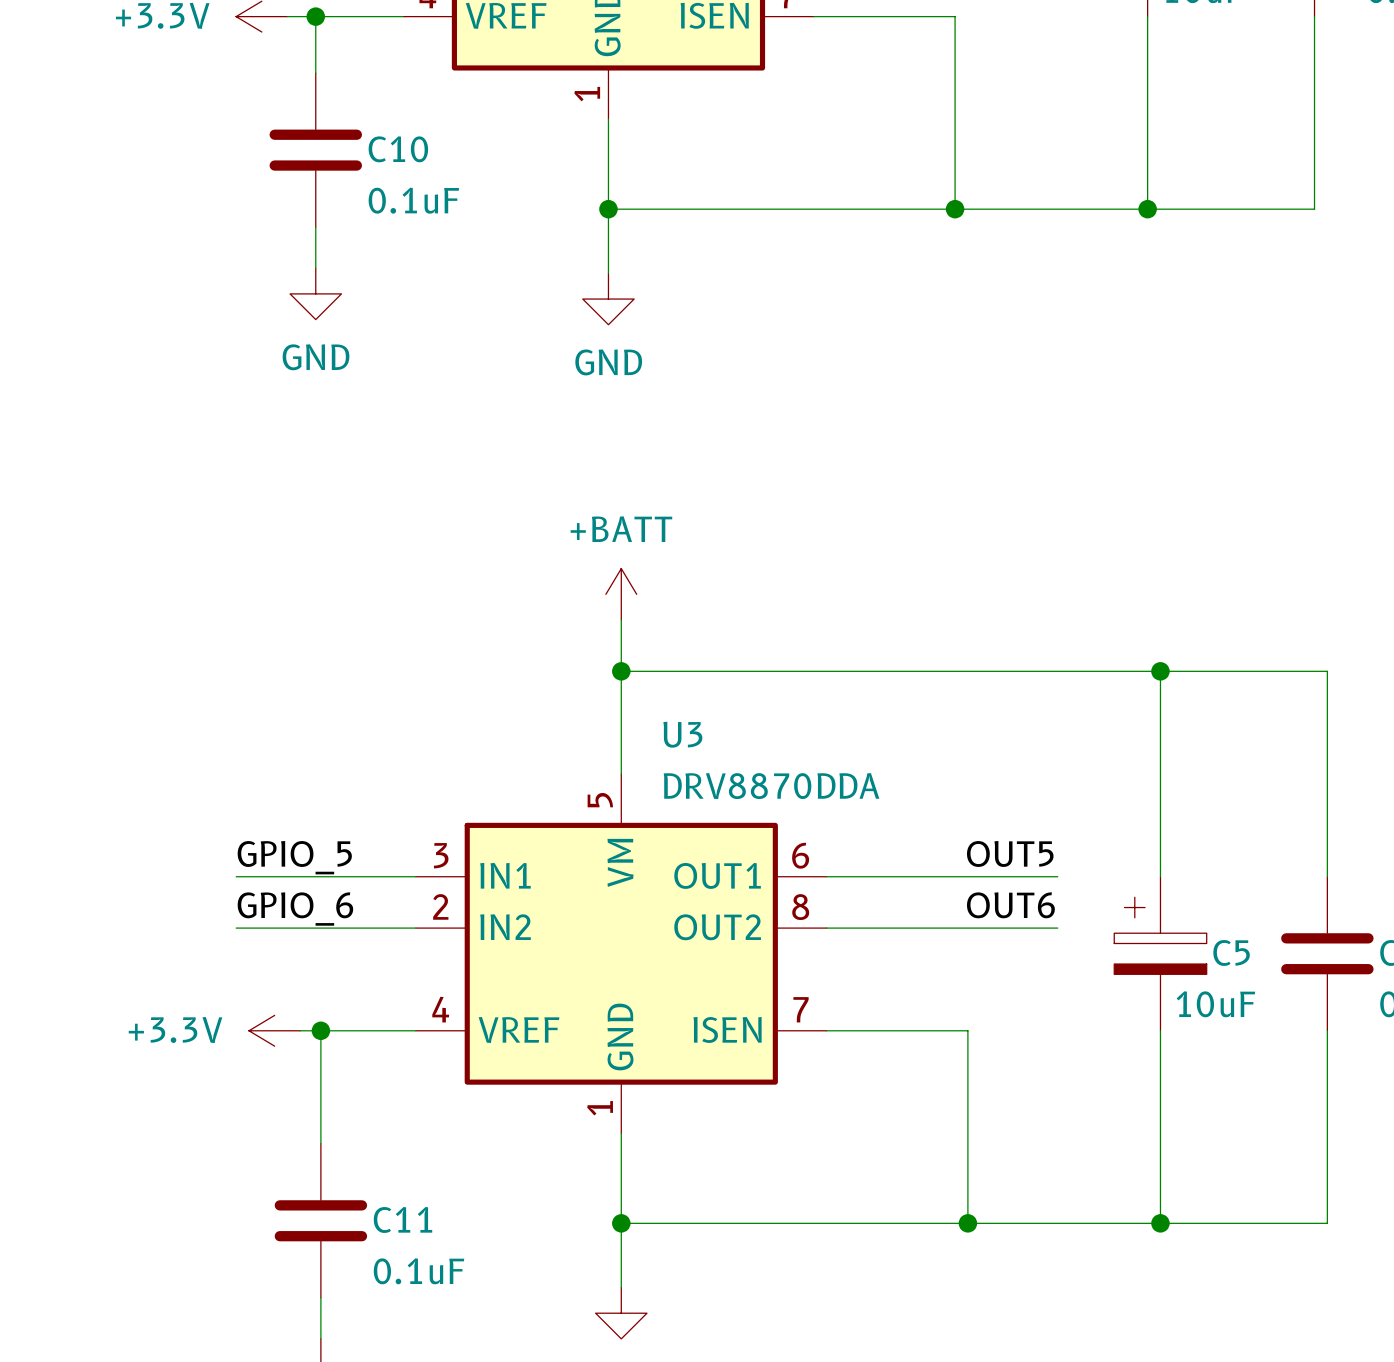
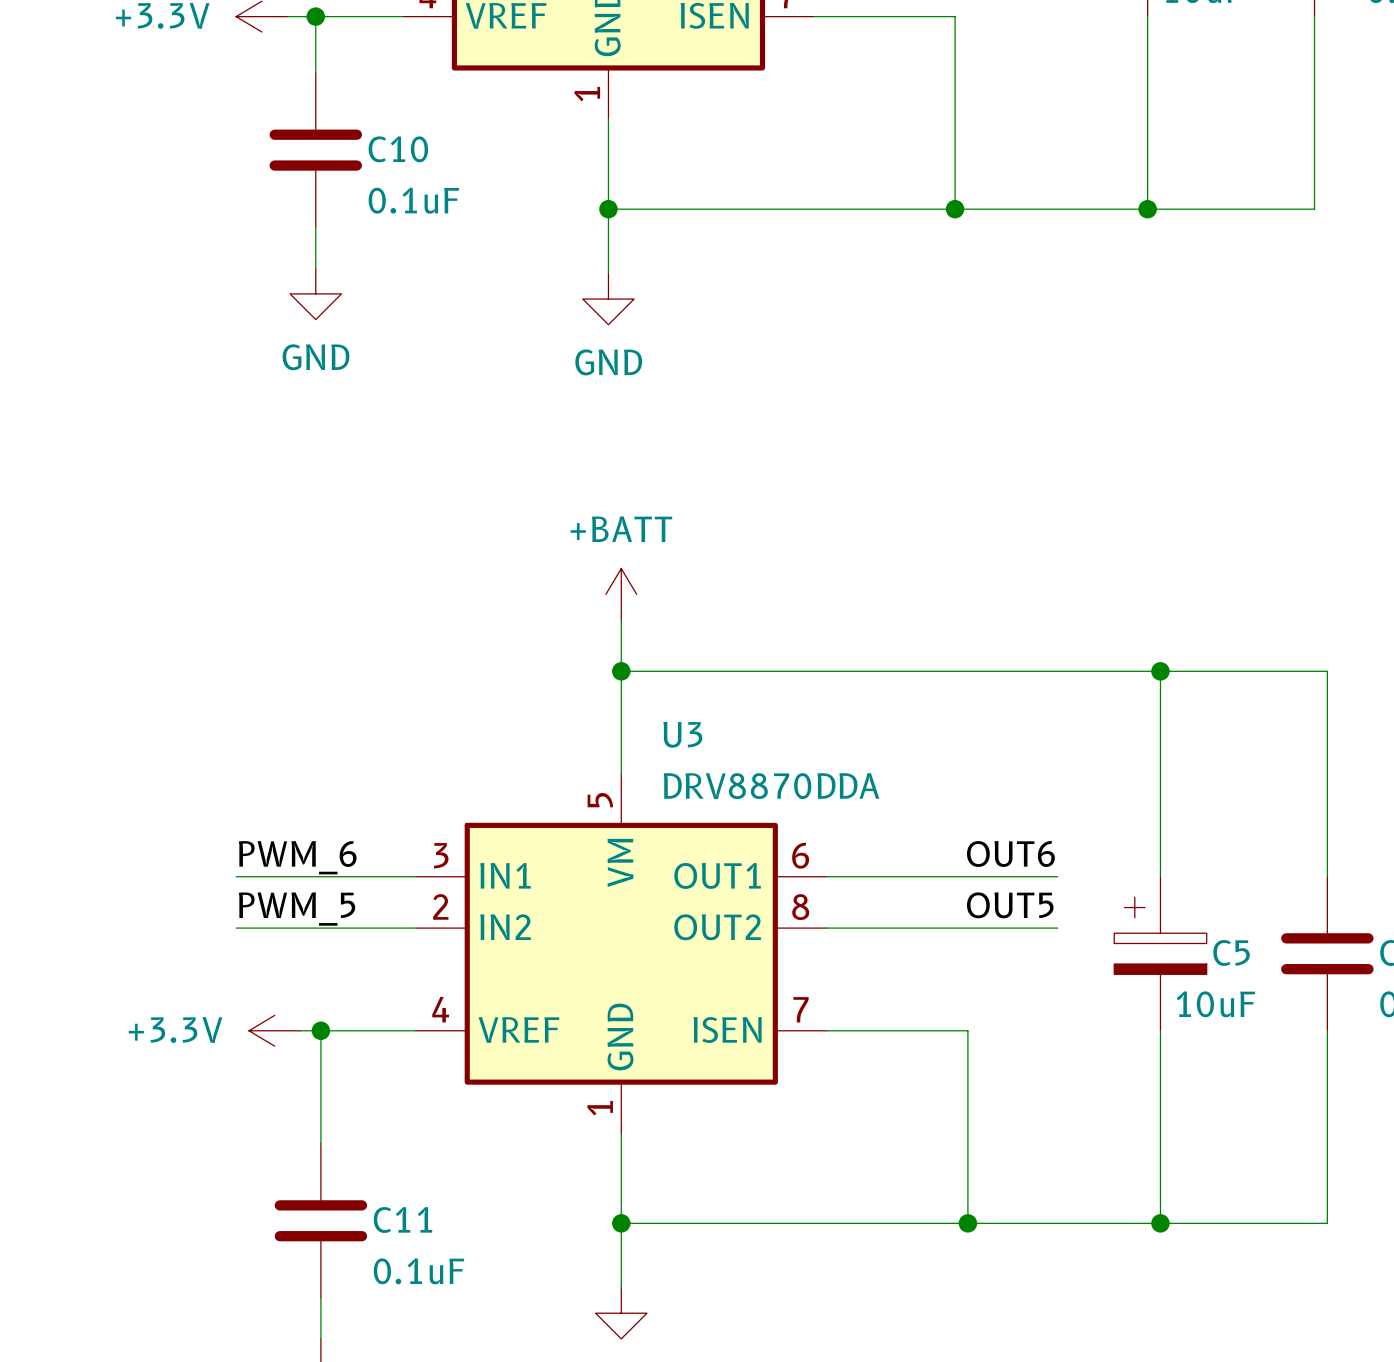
label: OUT5 (1010, 853) -> OUT6 (1010, 853)
label: GPIO_5 (294, 857) -> PWM_6 (297, 857)
label: OUT6 (1010, 905) -> OUT5 (1010, 905)
label: GPIO_6 (295, 909) -> PWM_5 (297, 909)

